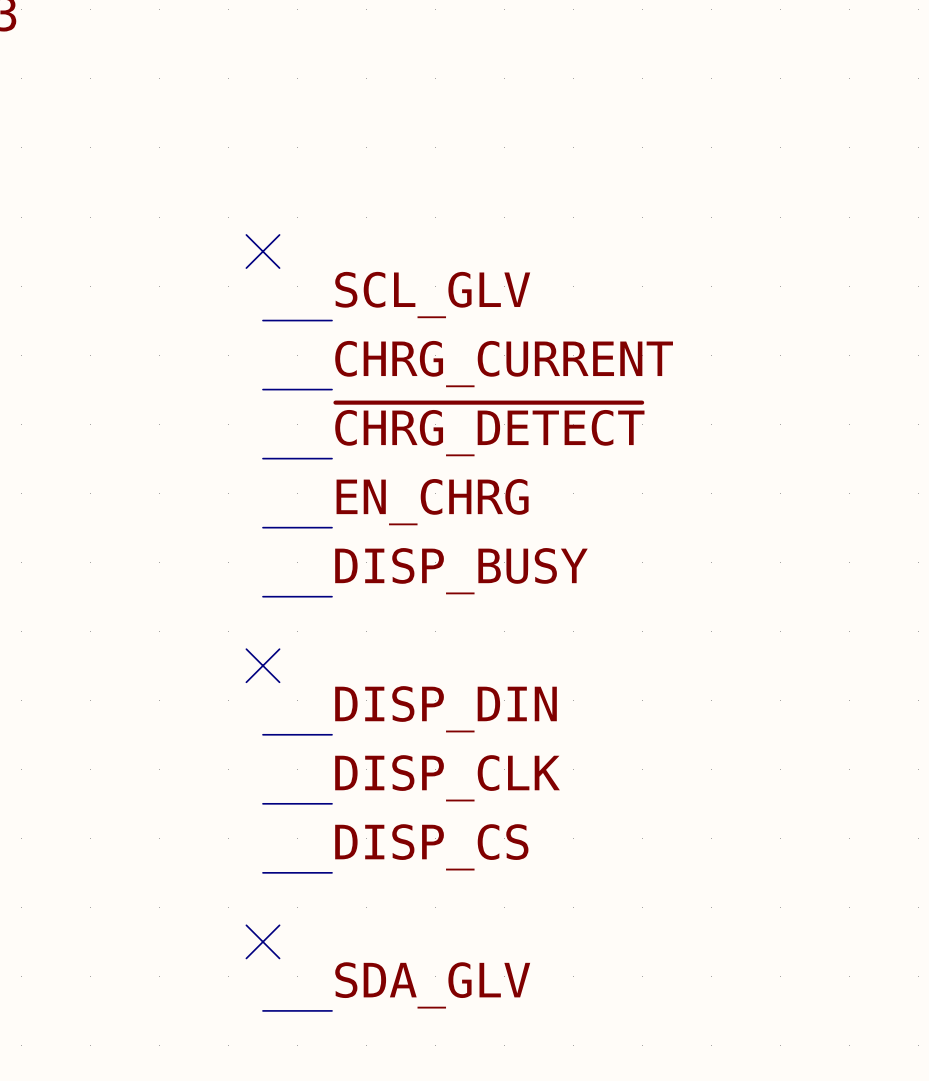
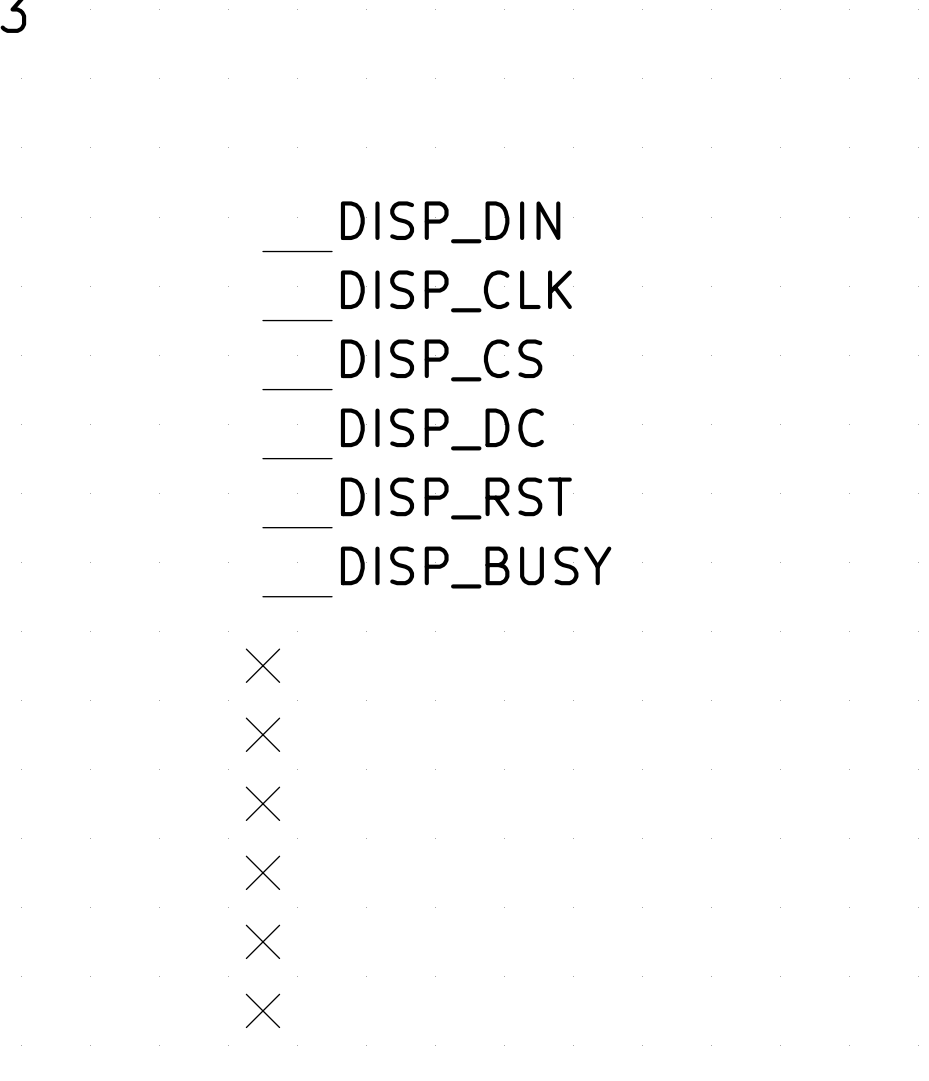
no-connect mark: (262, 251) -> none
label: SCL_GLV (432, 295) -> DISP_CLK (456, 291)
label: CHRG_CURRENT (504, 364) -> DISP_CS (441, 360)
label: ~{CHRG_DETECT} (489, 429) -> DISP_DC (442, 429)
label: EN_CHRG (432, 502) -> DISP_RST (456, 498)
label position: DISP_DIN (446, 709) -> DISP_DIN (450, 222)
wire: (262, 734) (332, 734) -> (262, 251) (332, 251)
no-connect mark: none -> (262, 734)
label: DISP_CLK (447, 778) -> none
wire: (262, 803) (332, 803) -> none
no-connect mark: none -> (262, 803)
label: DISP_CS (431, 847) -> none
wire: (262, 872) (332, 872) -> none
no-connect mark: none -> (262, 872)
label: SDA_GLV (432, 985) -> none
wire: (262, 1010) (332, 1010) -> none
no-connect mark: none -> (262, 1010)

